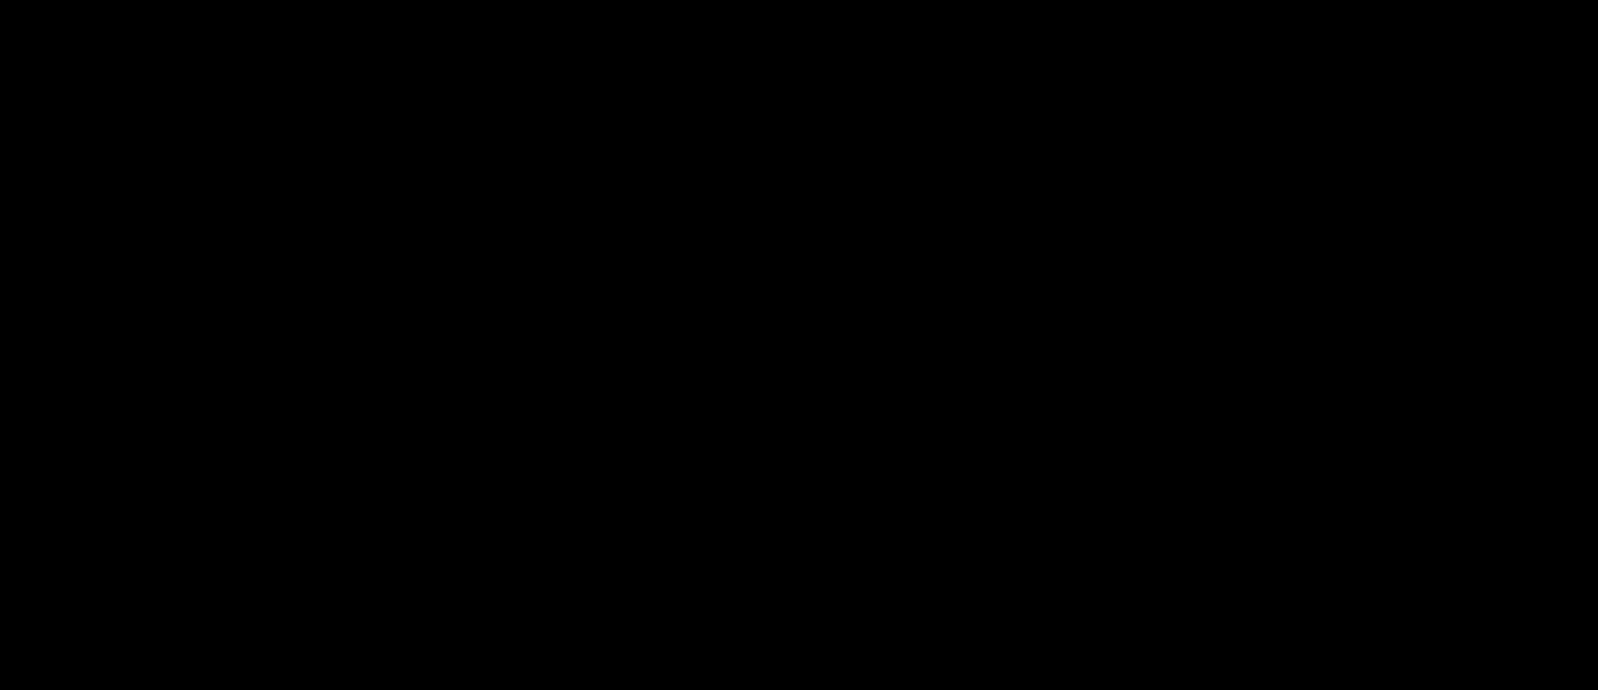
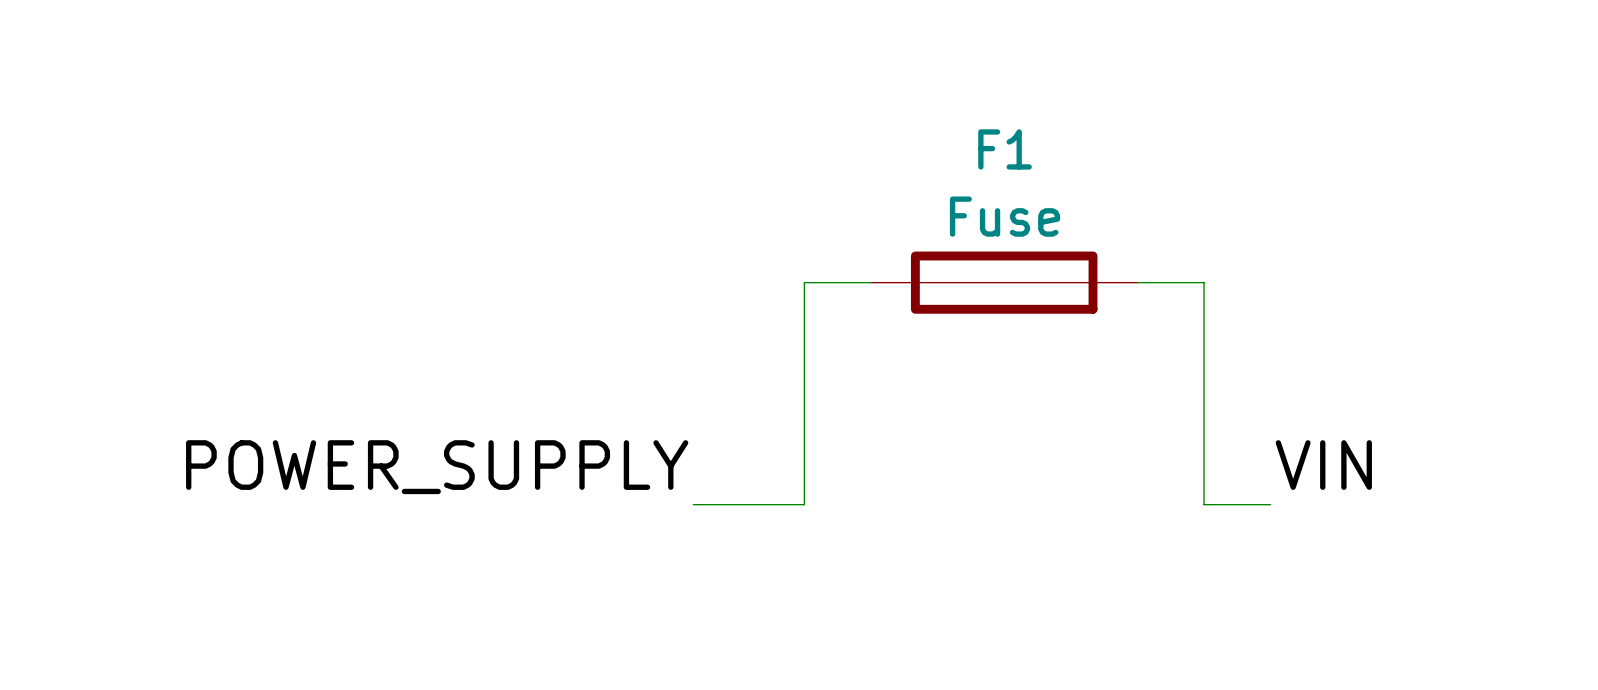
wire: none -> (870, 282) (804, 282) (804, 504) (693, 504)
F1: none -> Fuse (1004, 282)
wire: none -> (1137, 282) (1204, 282) (1204, 504) (1270, 504)
label: none -> VIN (1323, 465)
label: none -> POWER_SUPPLY (437, 467)

